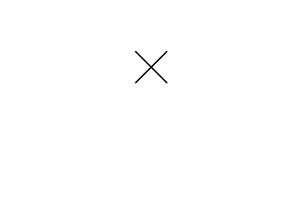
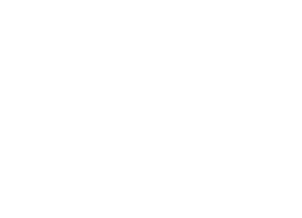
no-connect mark: (151, 67) -> none

